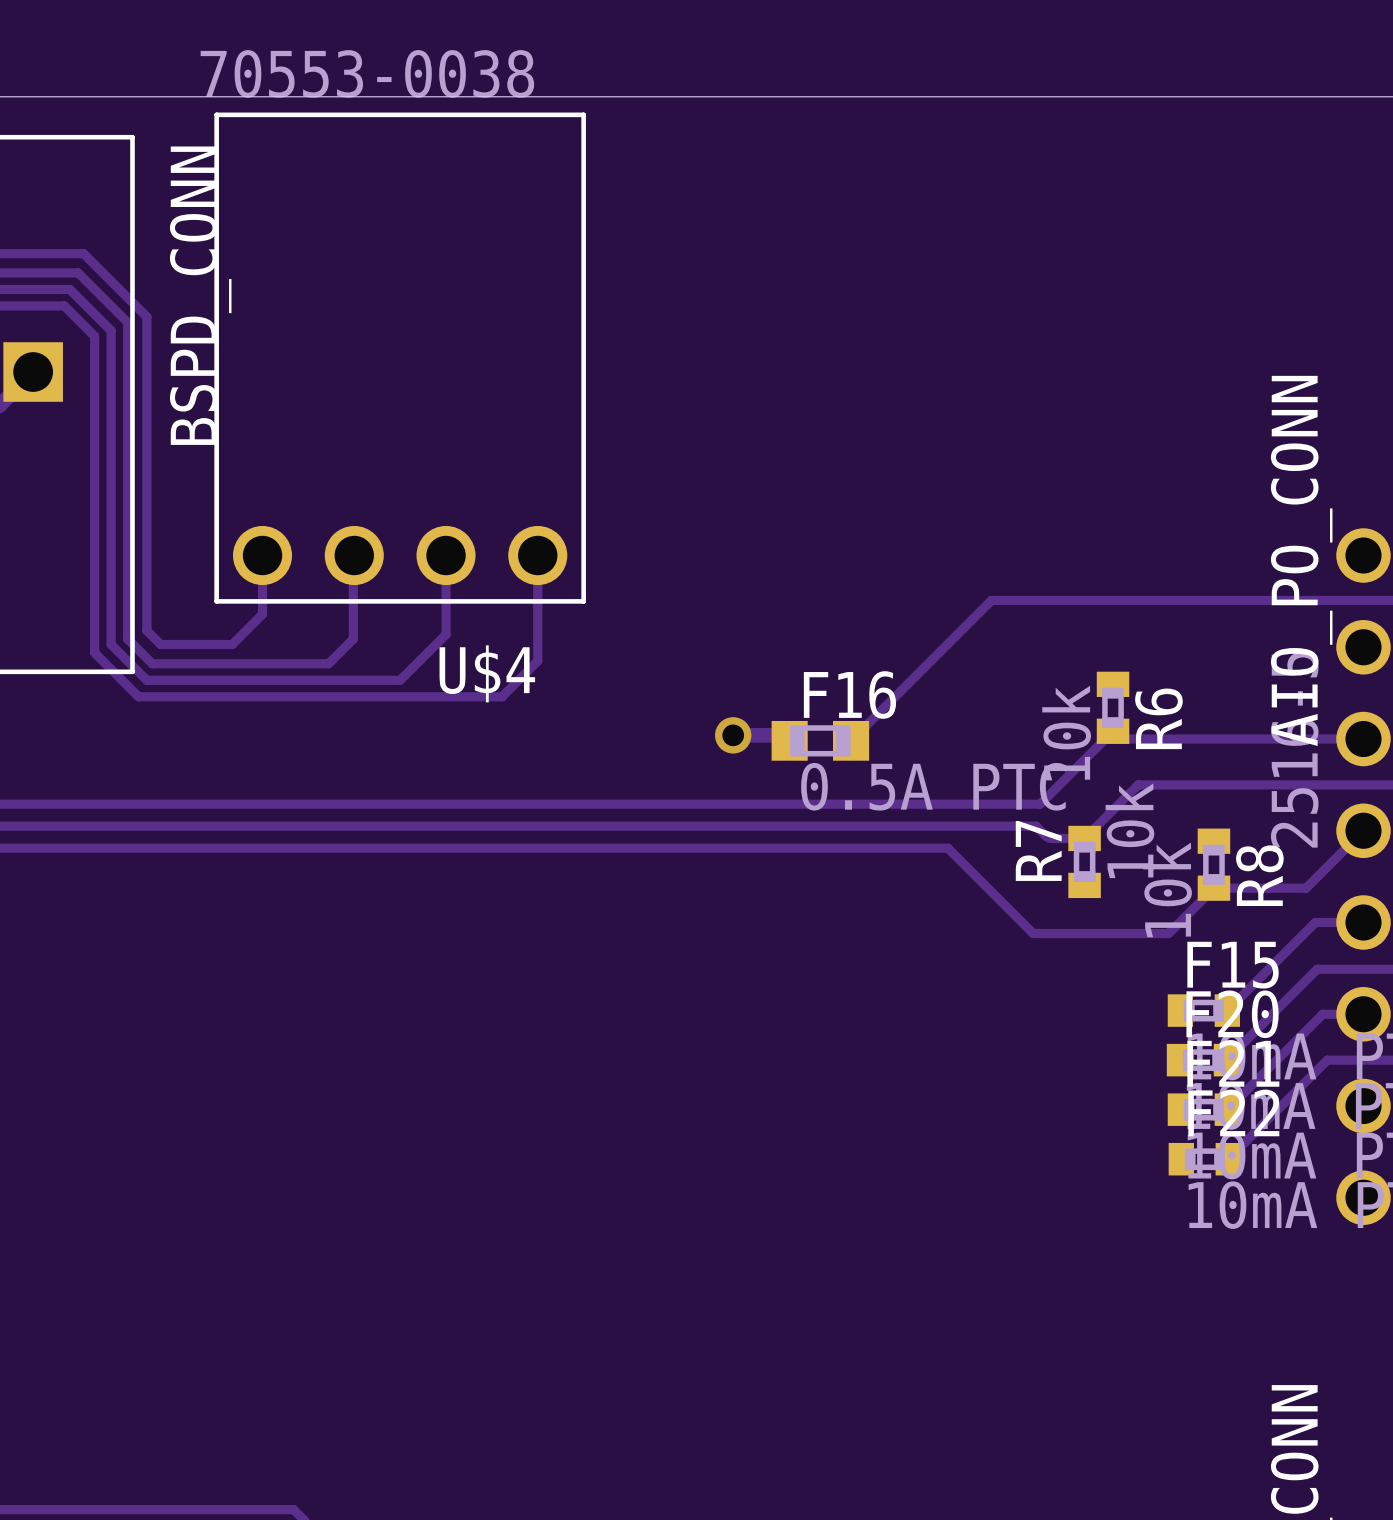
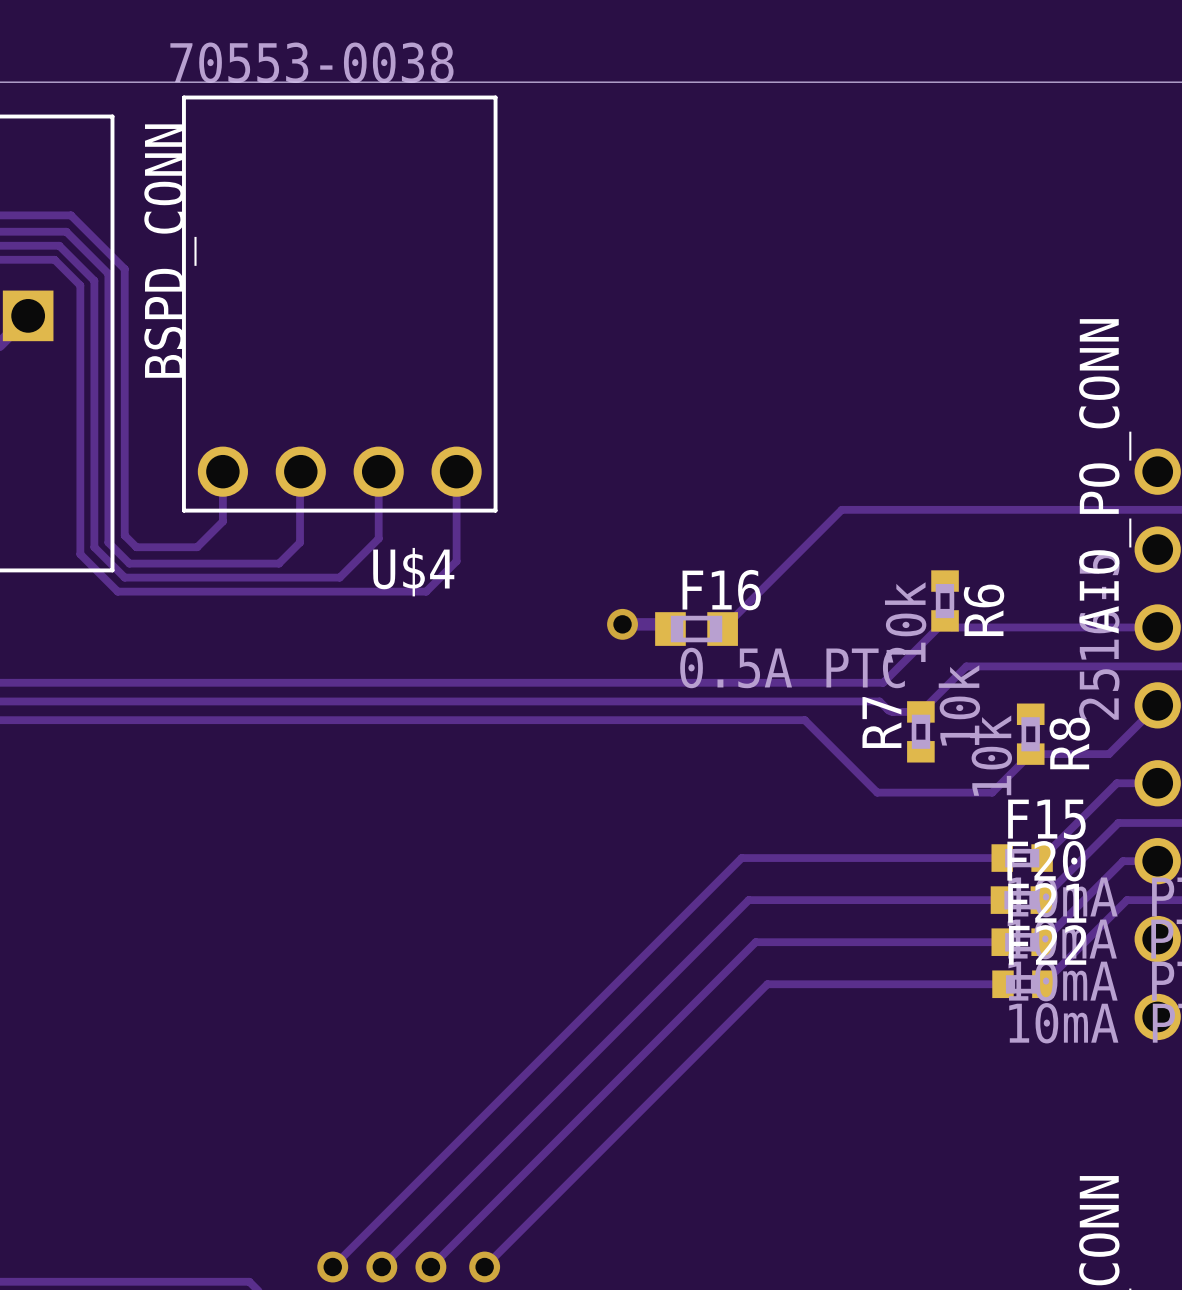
track: none -> (1002, 858) (741, 858) (332, 1267)
track: none -> (1001, 900) (748, 900) (381, 1267)
track: none -> (1002, 942) (755, 942) (430, 1267)
track: none -> (1003, 984) (767, 984) (484, 1267)
via: none -> (332, 1267)
via: none -> (381, 1267)
via: none -> (430, 1267)
via: none -> (484, 1267)

